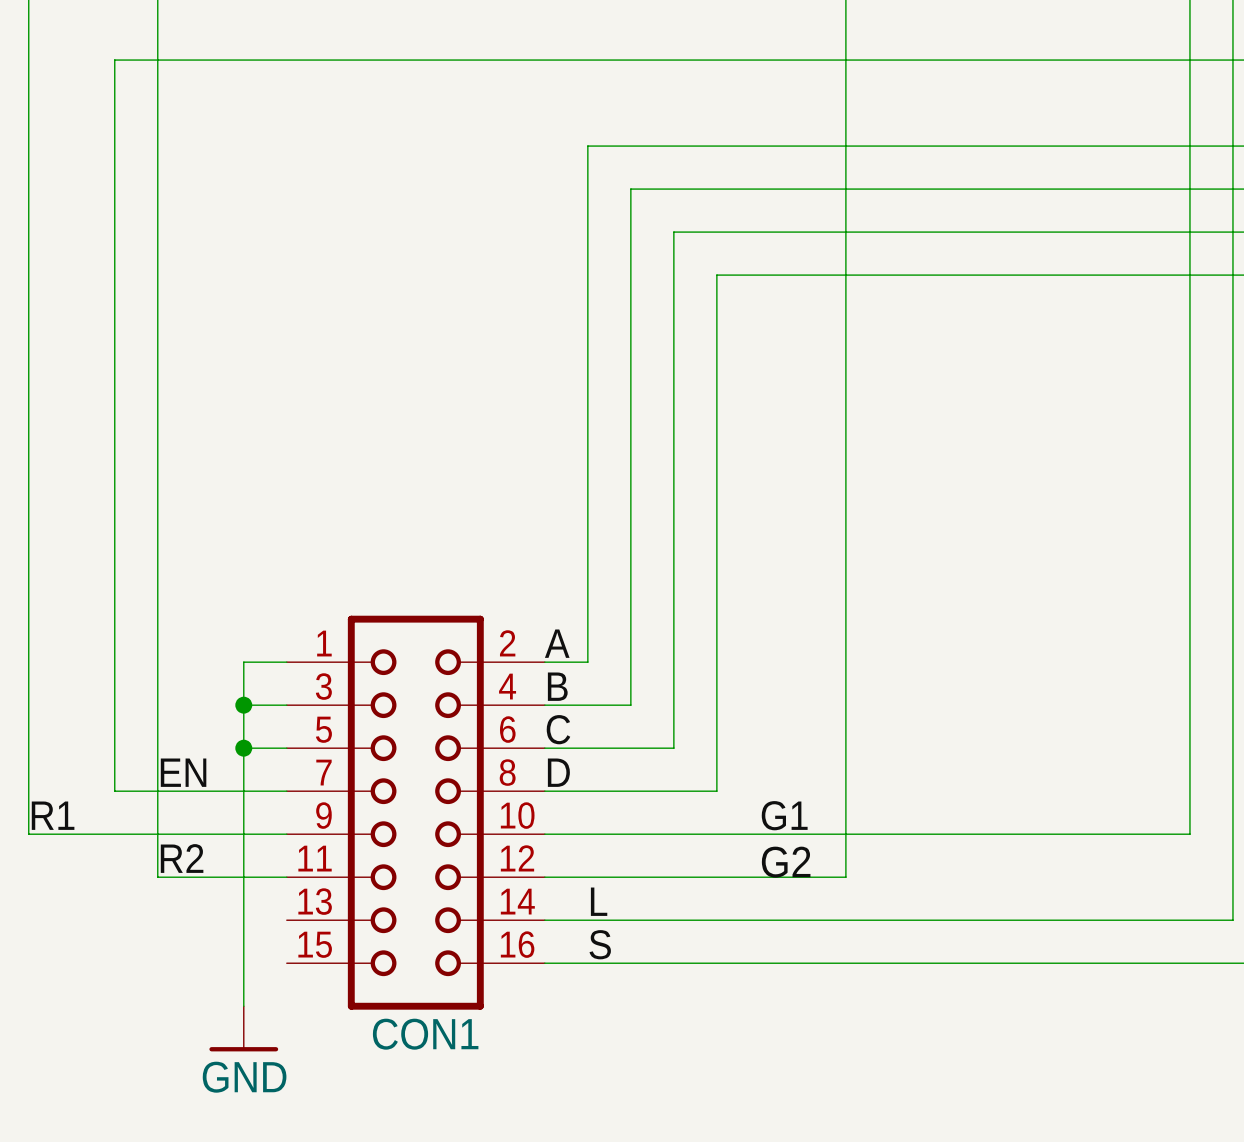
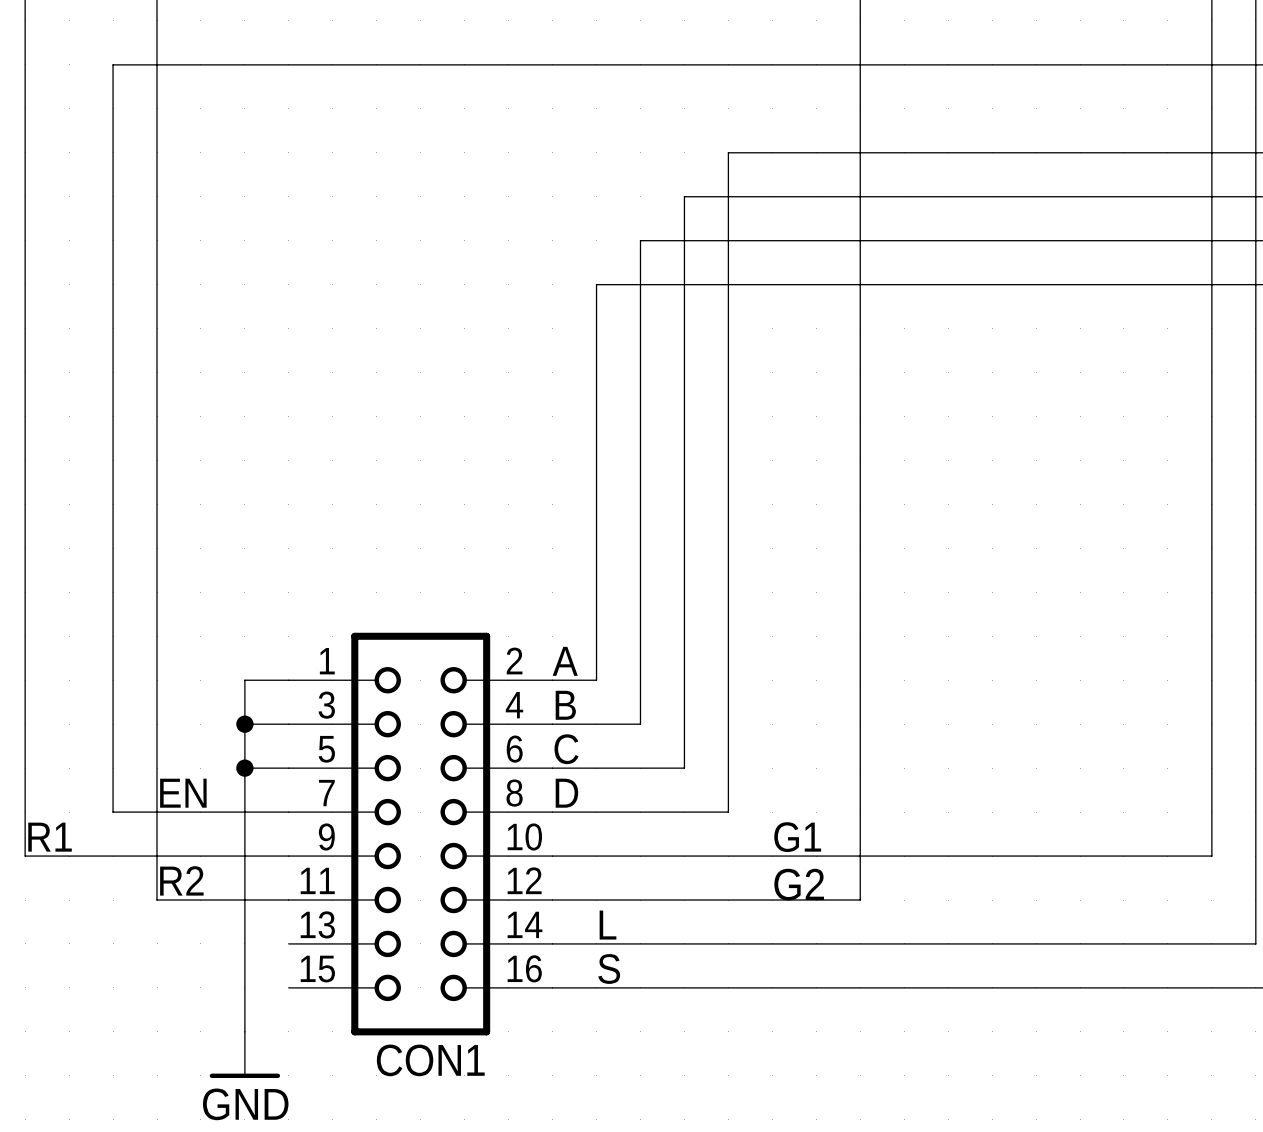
wire: (716, 146) (587, 146) (587, 275) -> (728, 152) (728, 284) (596, 284)
wire: (673, 189) (630, 189) (630, 232) -> (684, 196) (684, 240) (640, 240)

